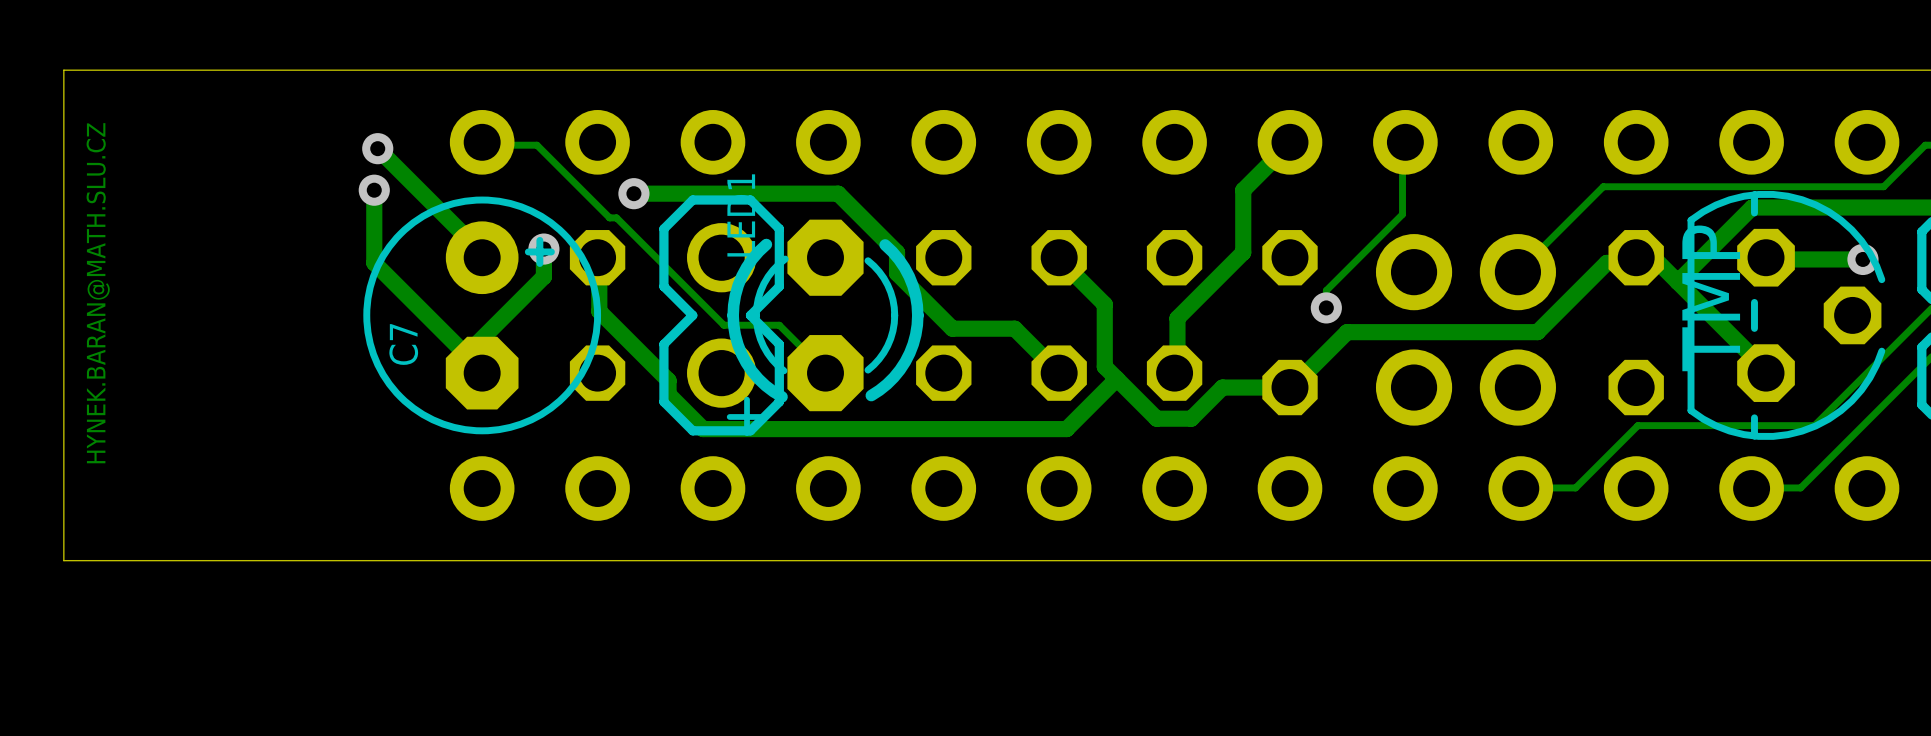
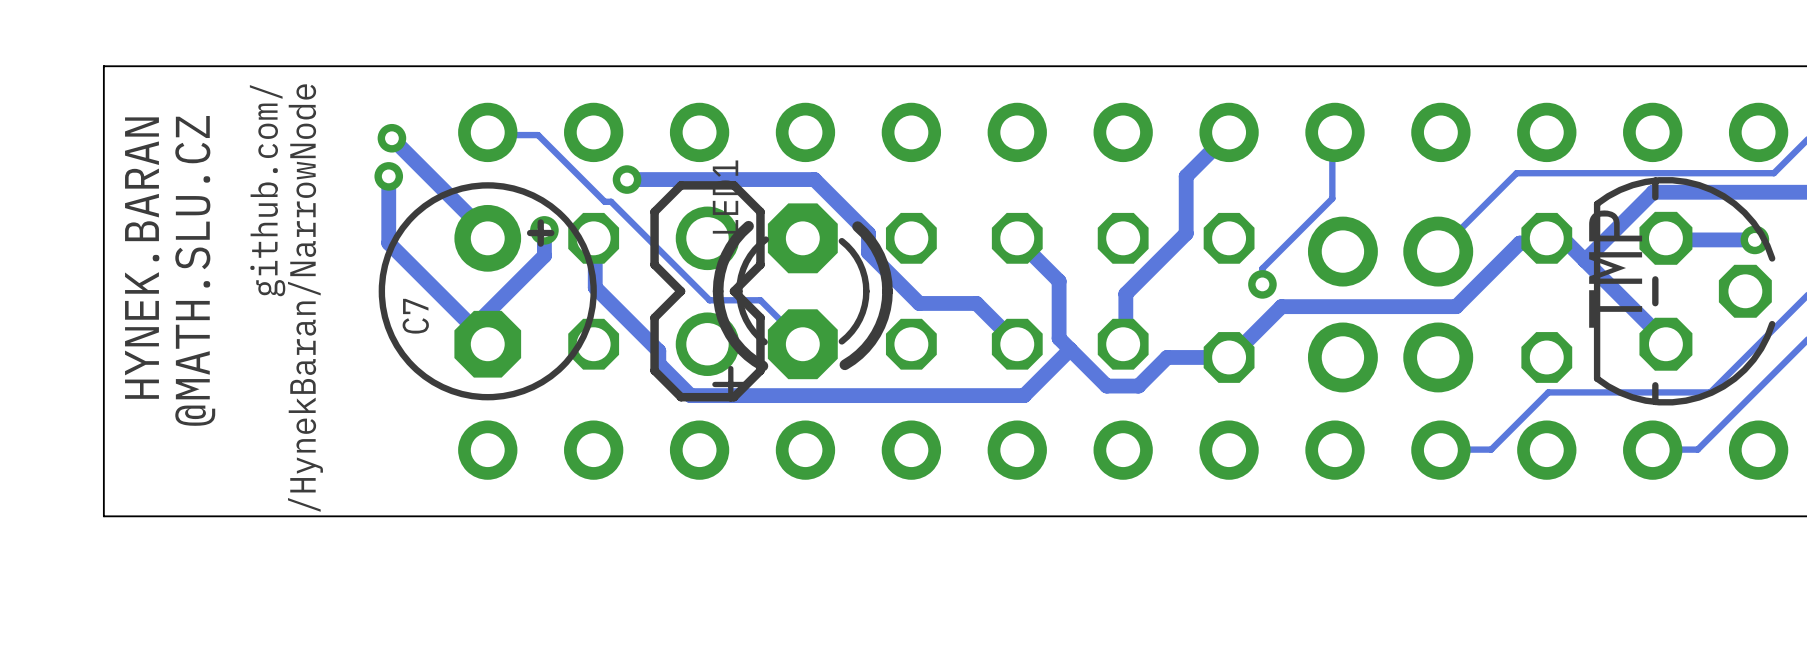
text: none -> github.com/ (267, 190)
text: HYNEK.BARAN@MATH.SLU.CZ (98, 293) -> HYNEK.BARAN (142, 258)
text: none -> @MATH.SLU.CZ (195, 270)
text: none -> /HynekBaran/NarrowNode (305, 298)

